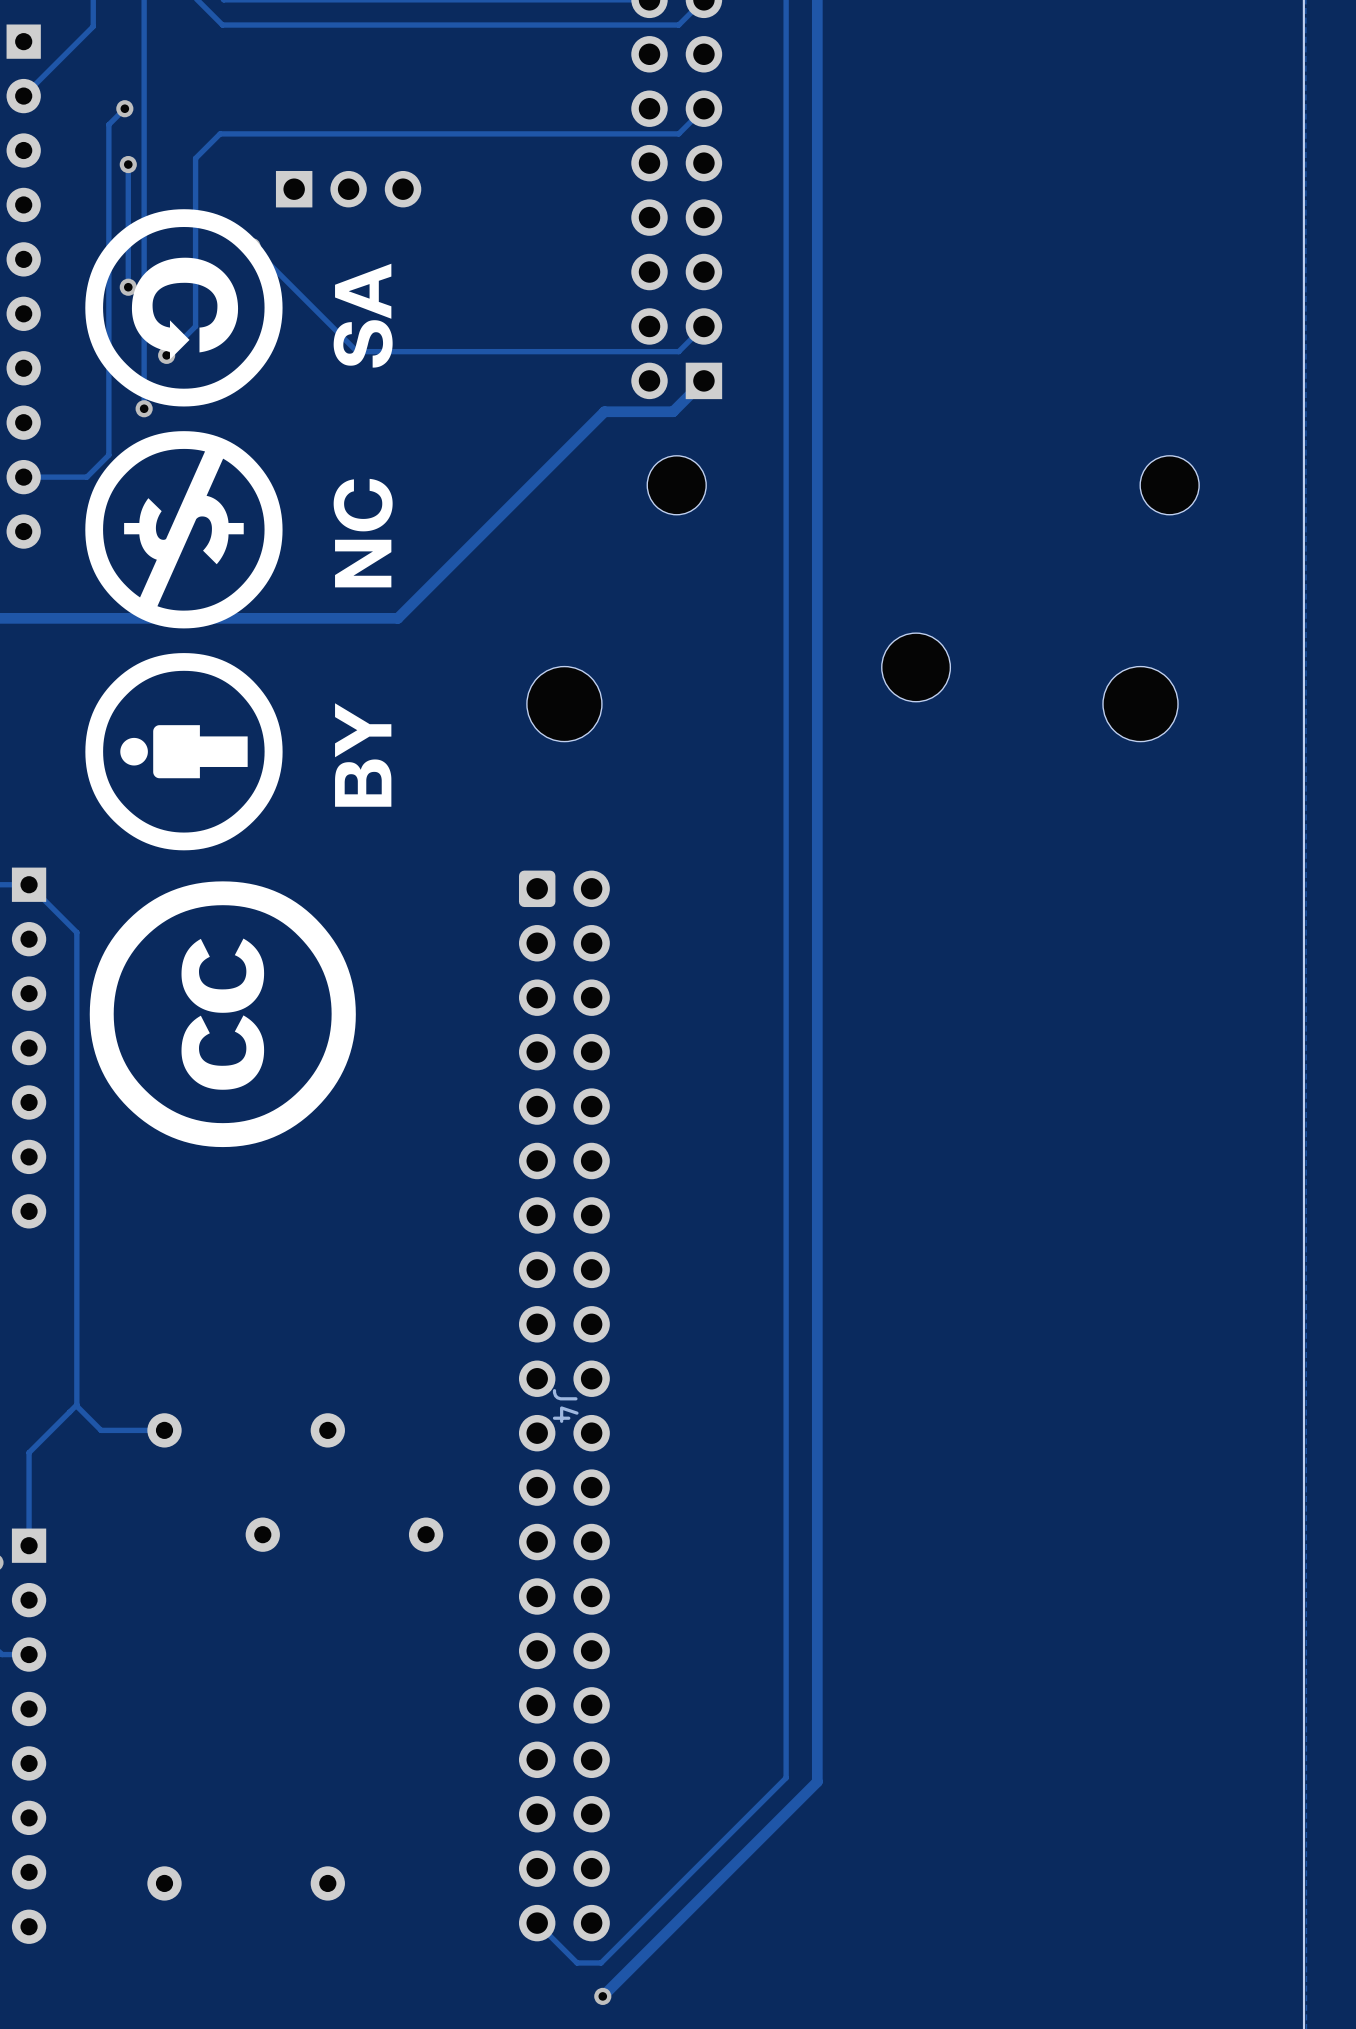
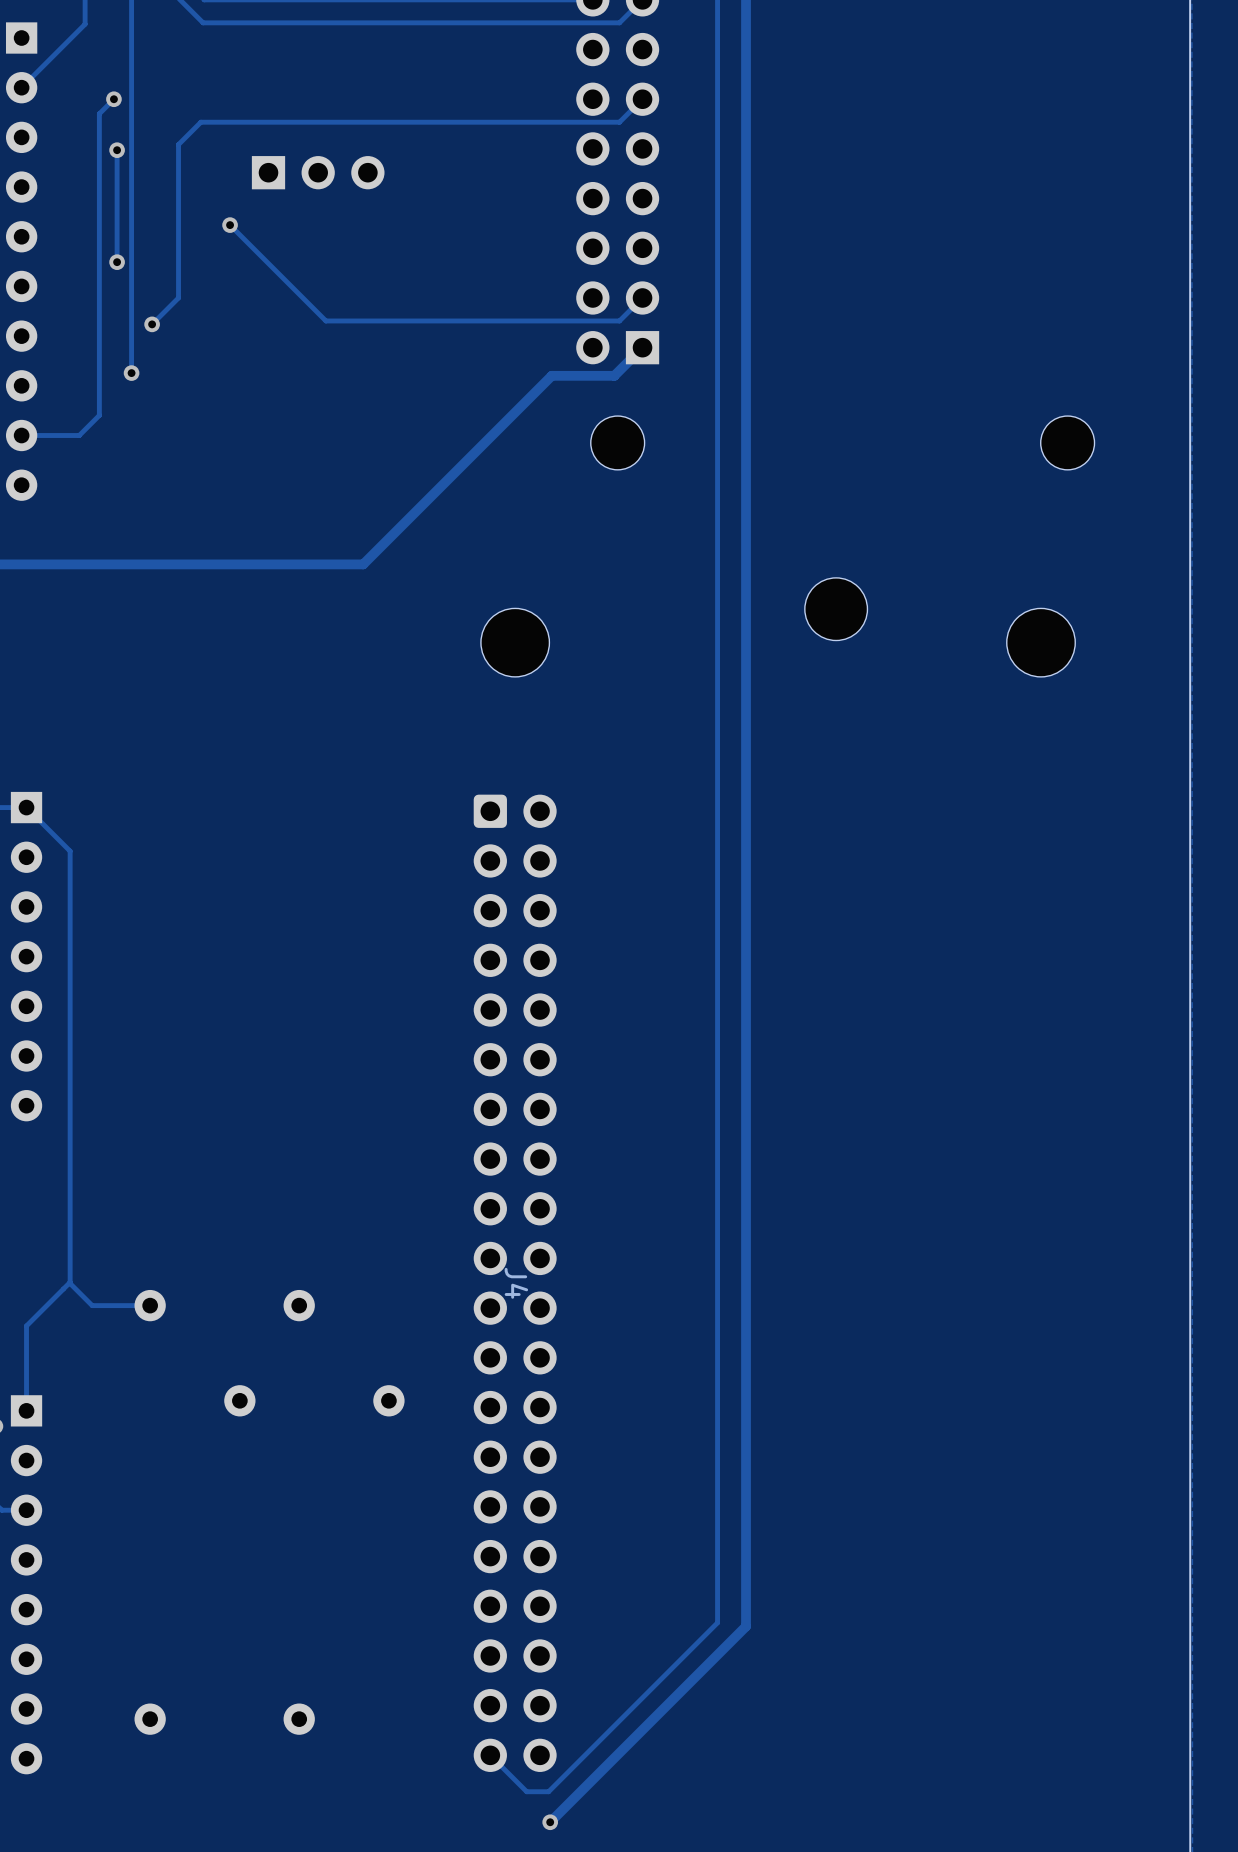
drawing: [85, 209, 283, 851] -> none
drawing: [333, 263, 393, 368] -> none
drawing: [333, 478, 393, 588] -> none
drawing: [335, 703, 392, 807] -> none
drawing: [89, 881, 356, 1148] -> none

